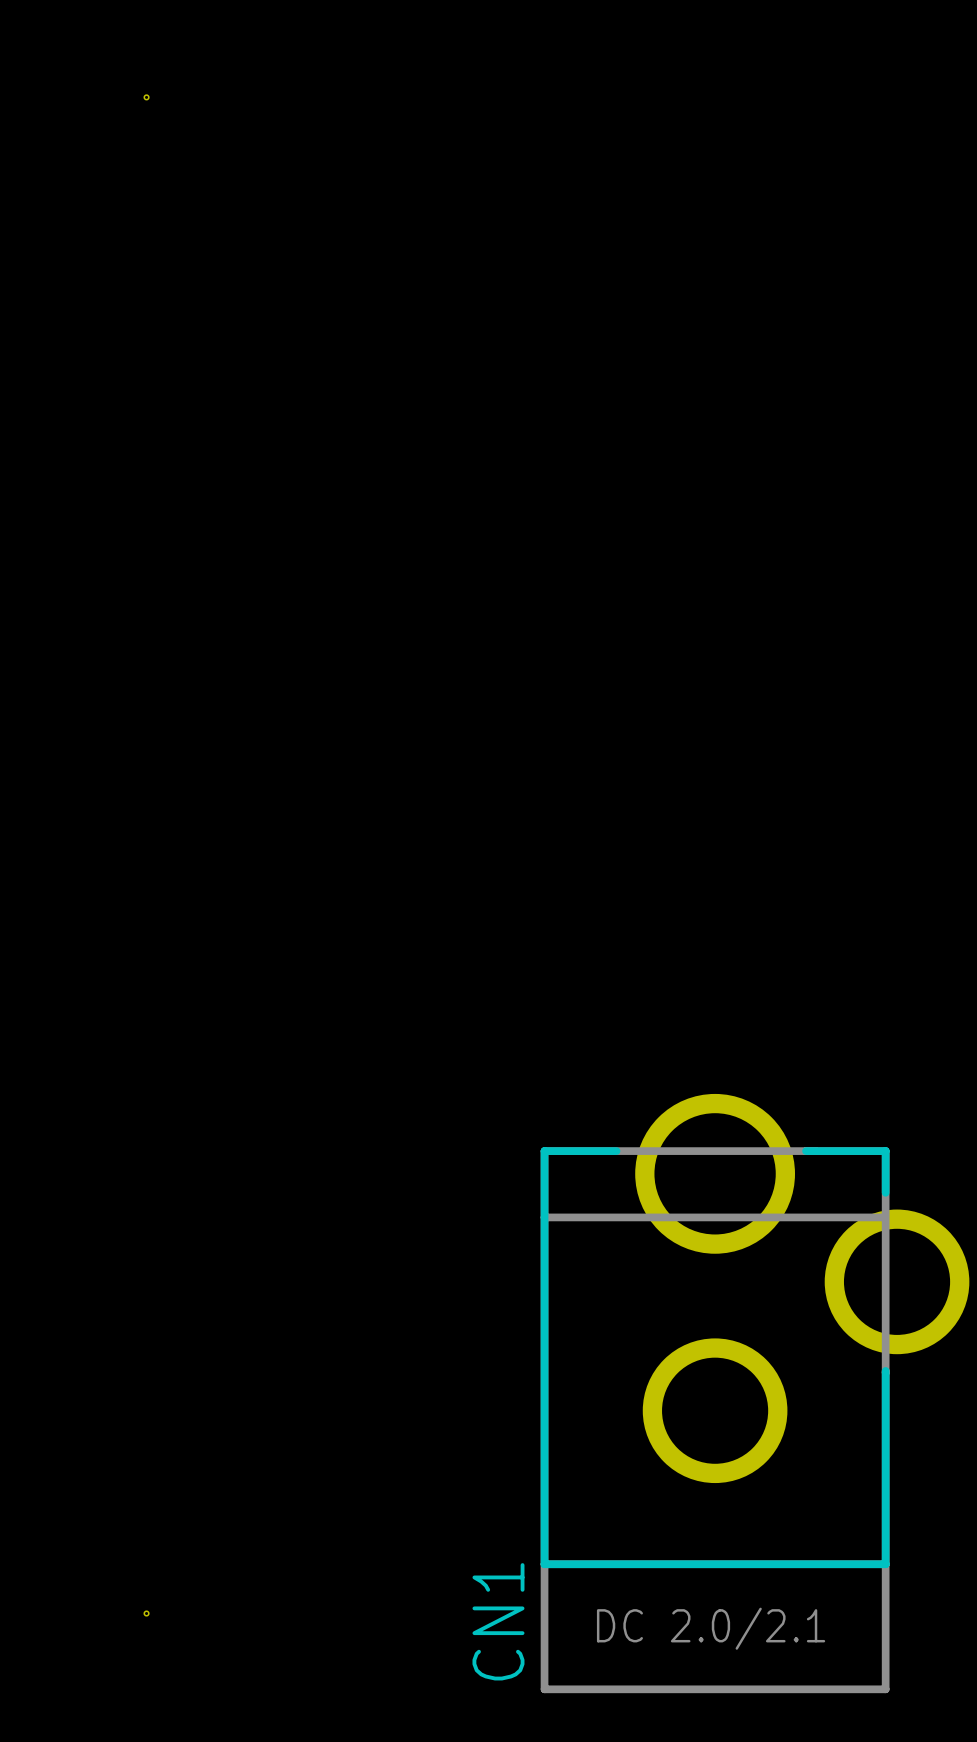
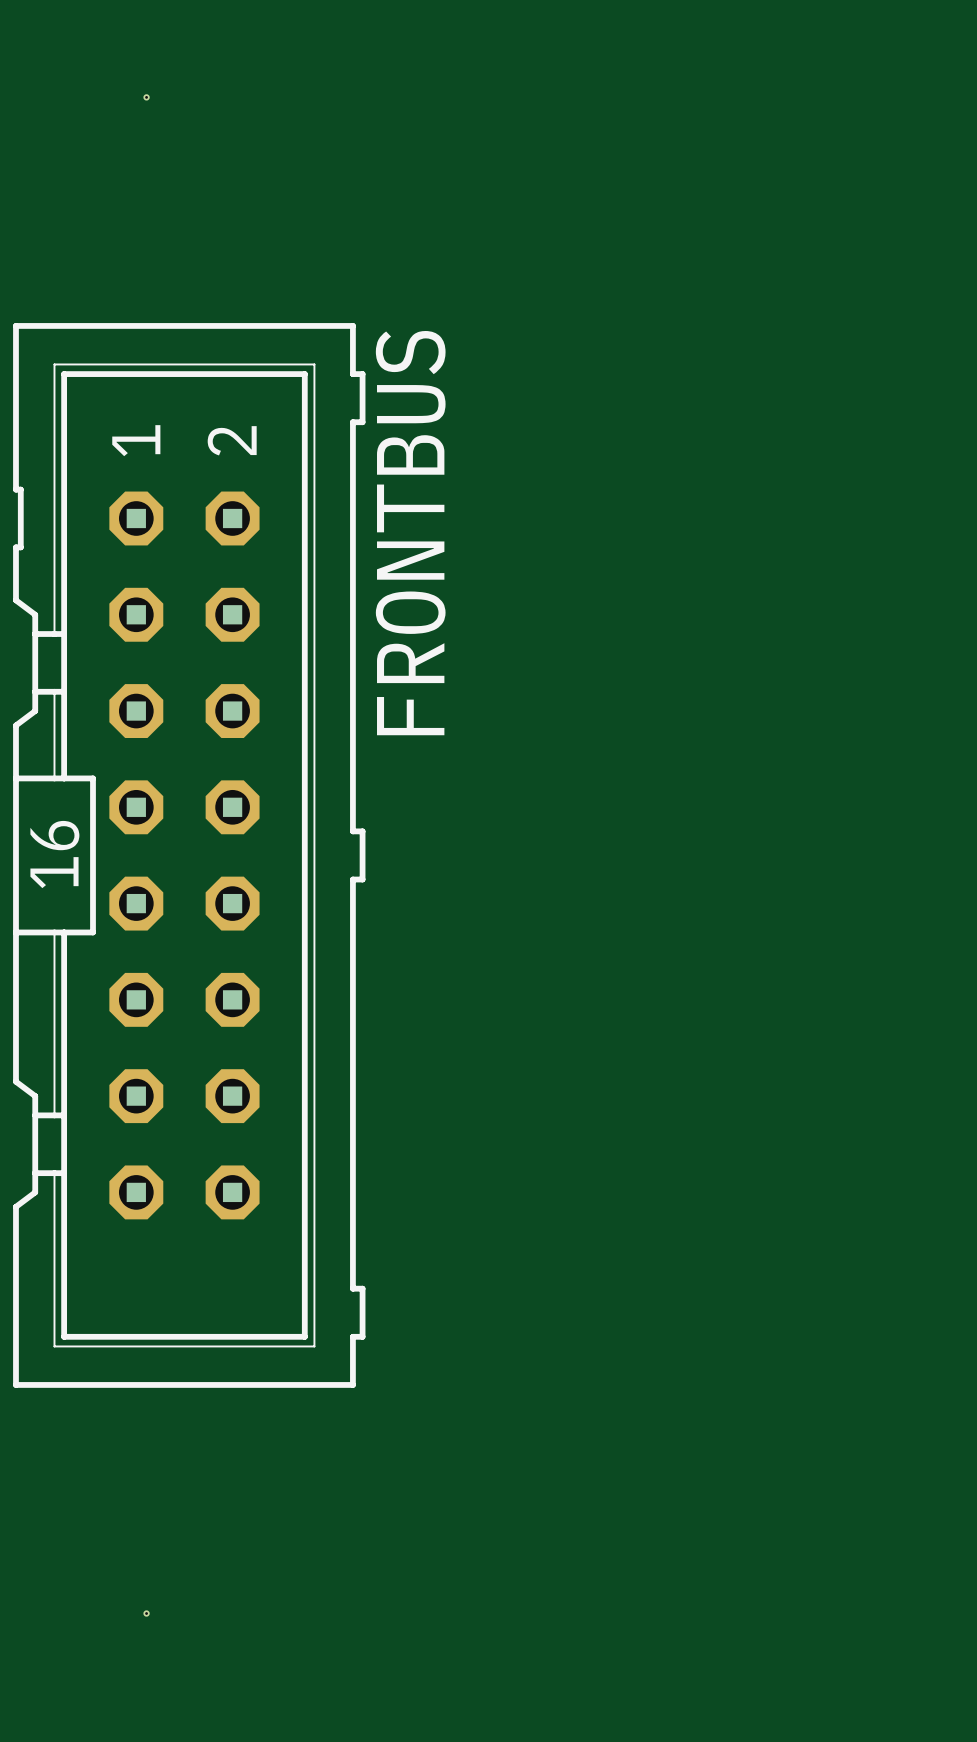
FRONTBUS: none -> (189, 855)
CN1: (755, 1393) -> none

